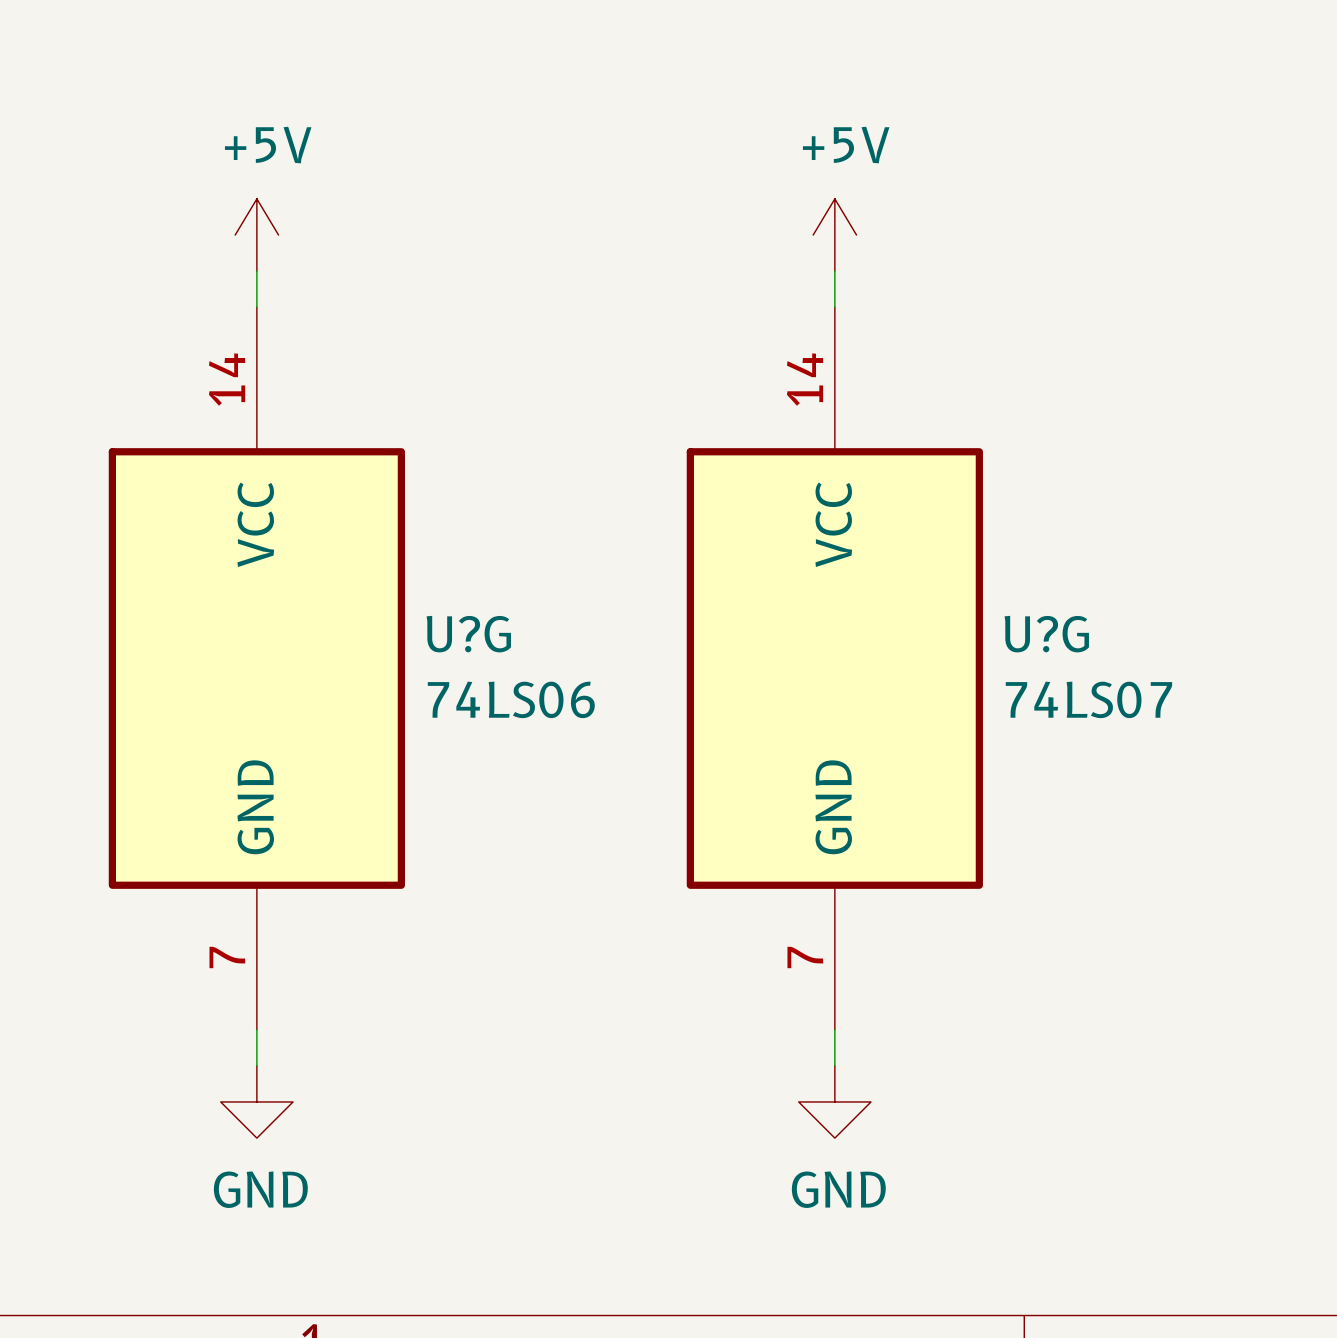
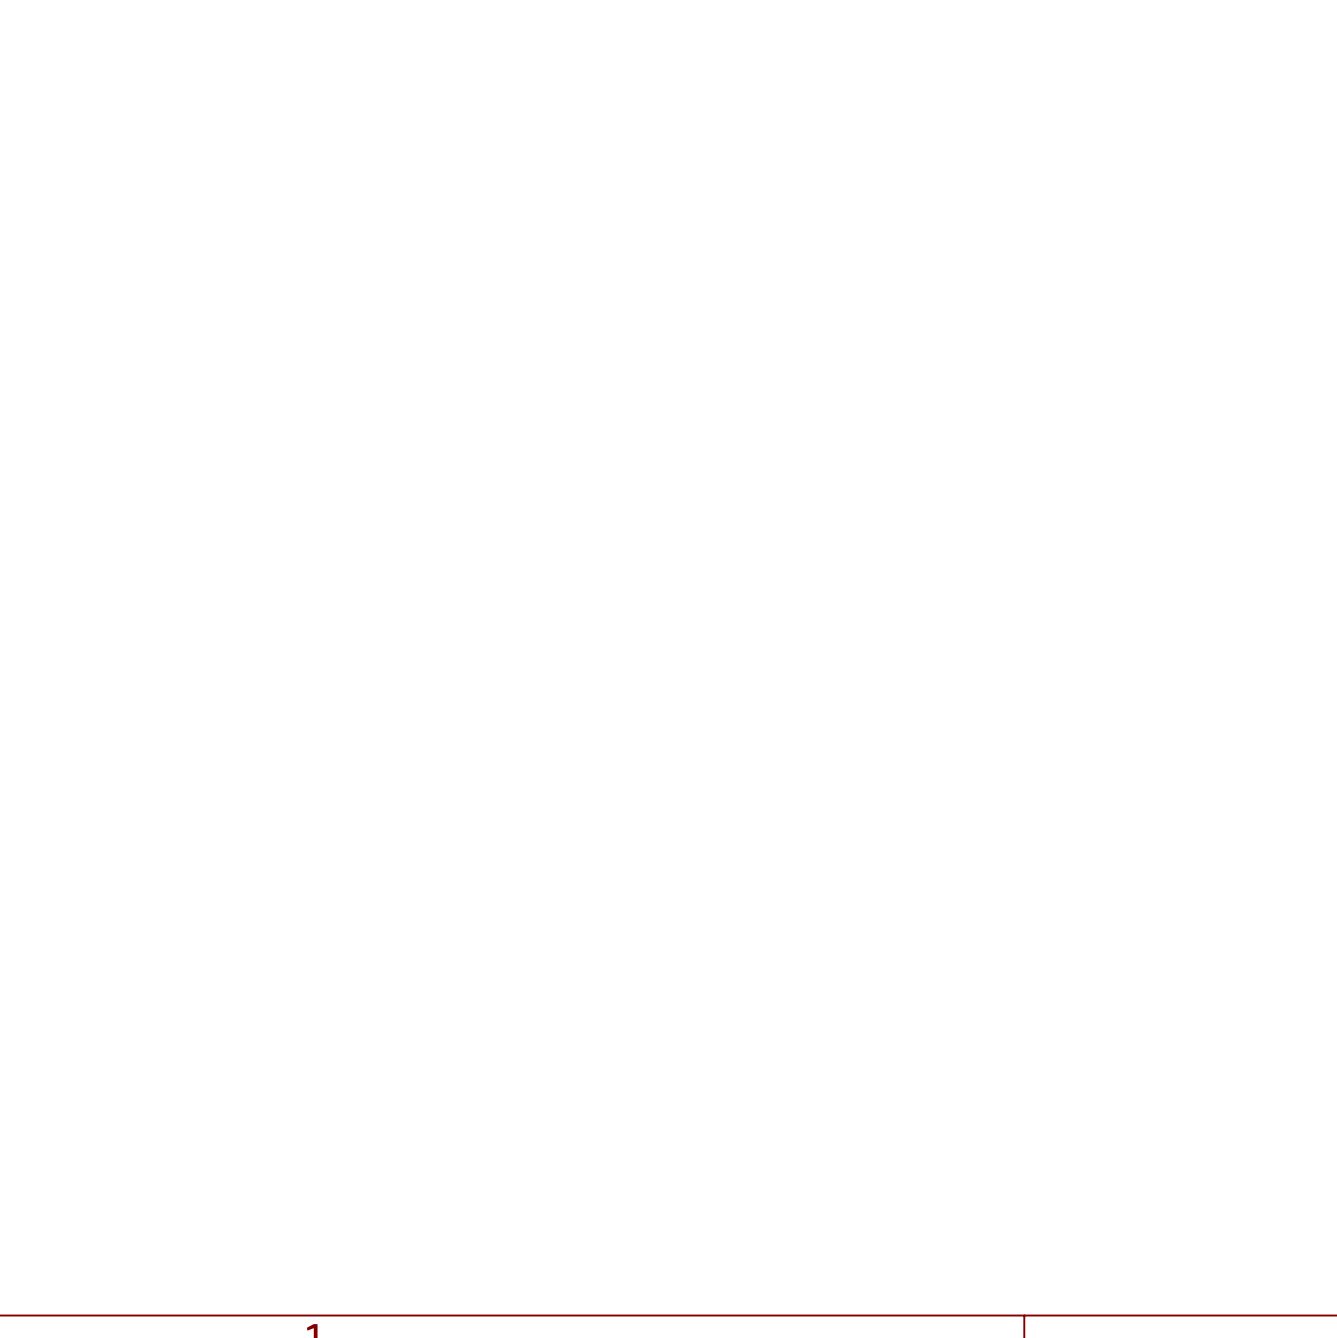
power symbol: +5V (256, 235) -> none
power symbol: +5V (834, 235) -> none
wire: (256, 271) (256, 307) -> none
wire: (834, 271) (834, 307) -> none
U?G: 74LS06 (256, 668) -> none
U?G: 74LS07 (834, 668) -> none
wire: (256, 1029) (256, 1065) -> none
wire: (834, 1029) (834, 1065) -> none
power symbol: GND (256, 1101) -> none
power symbol: GND (834, 1101) -> none

